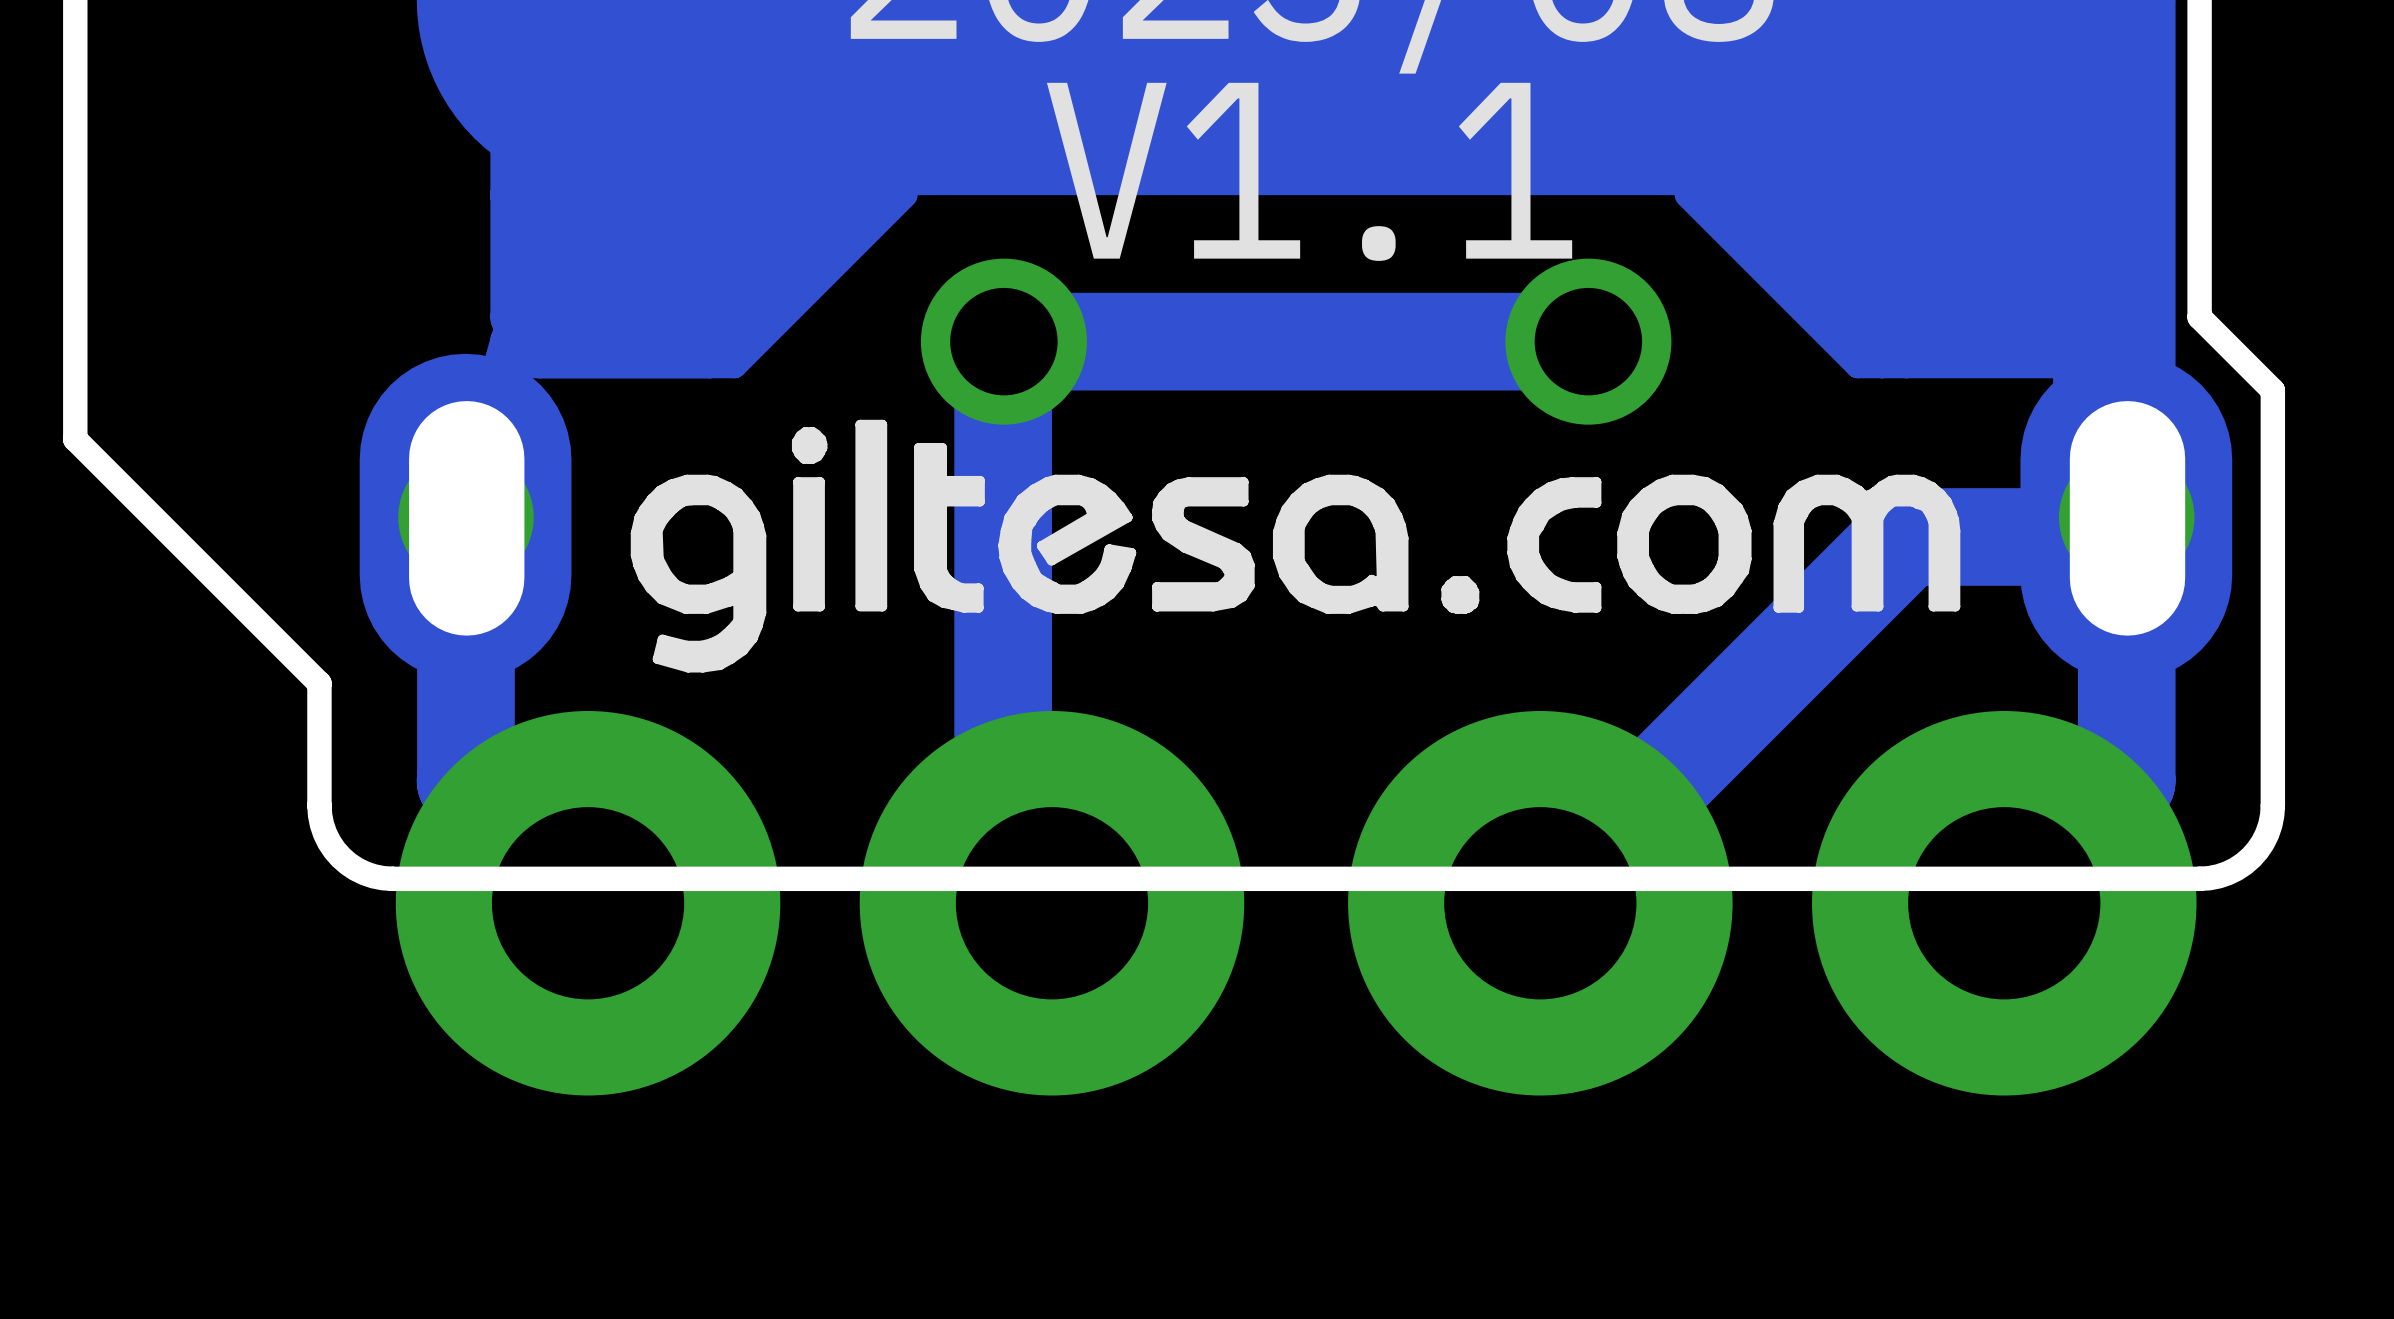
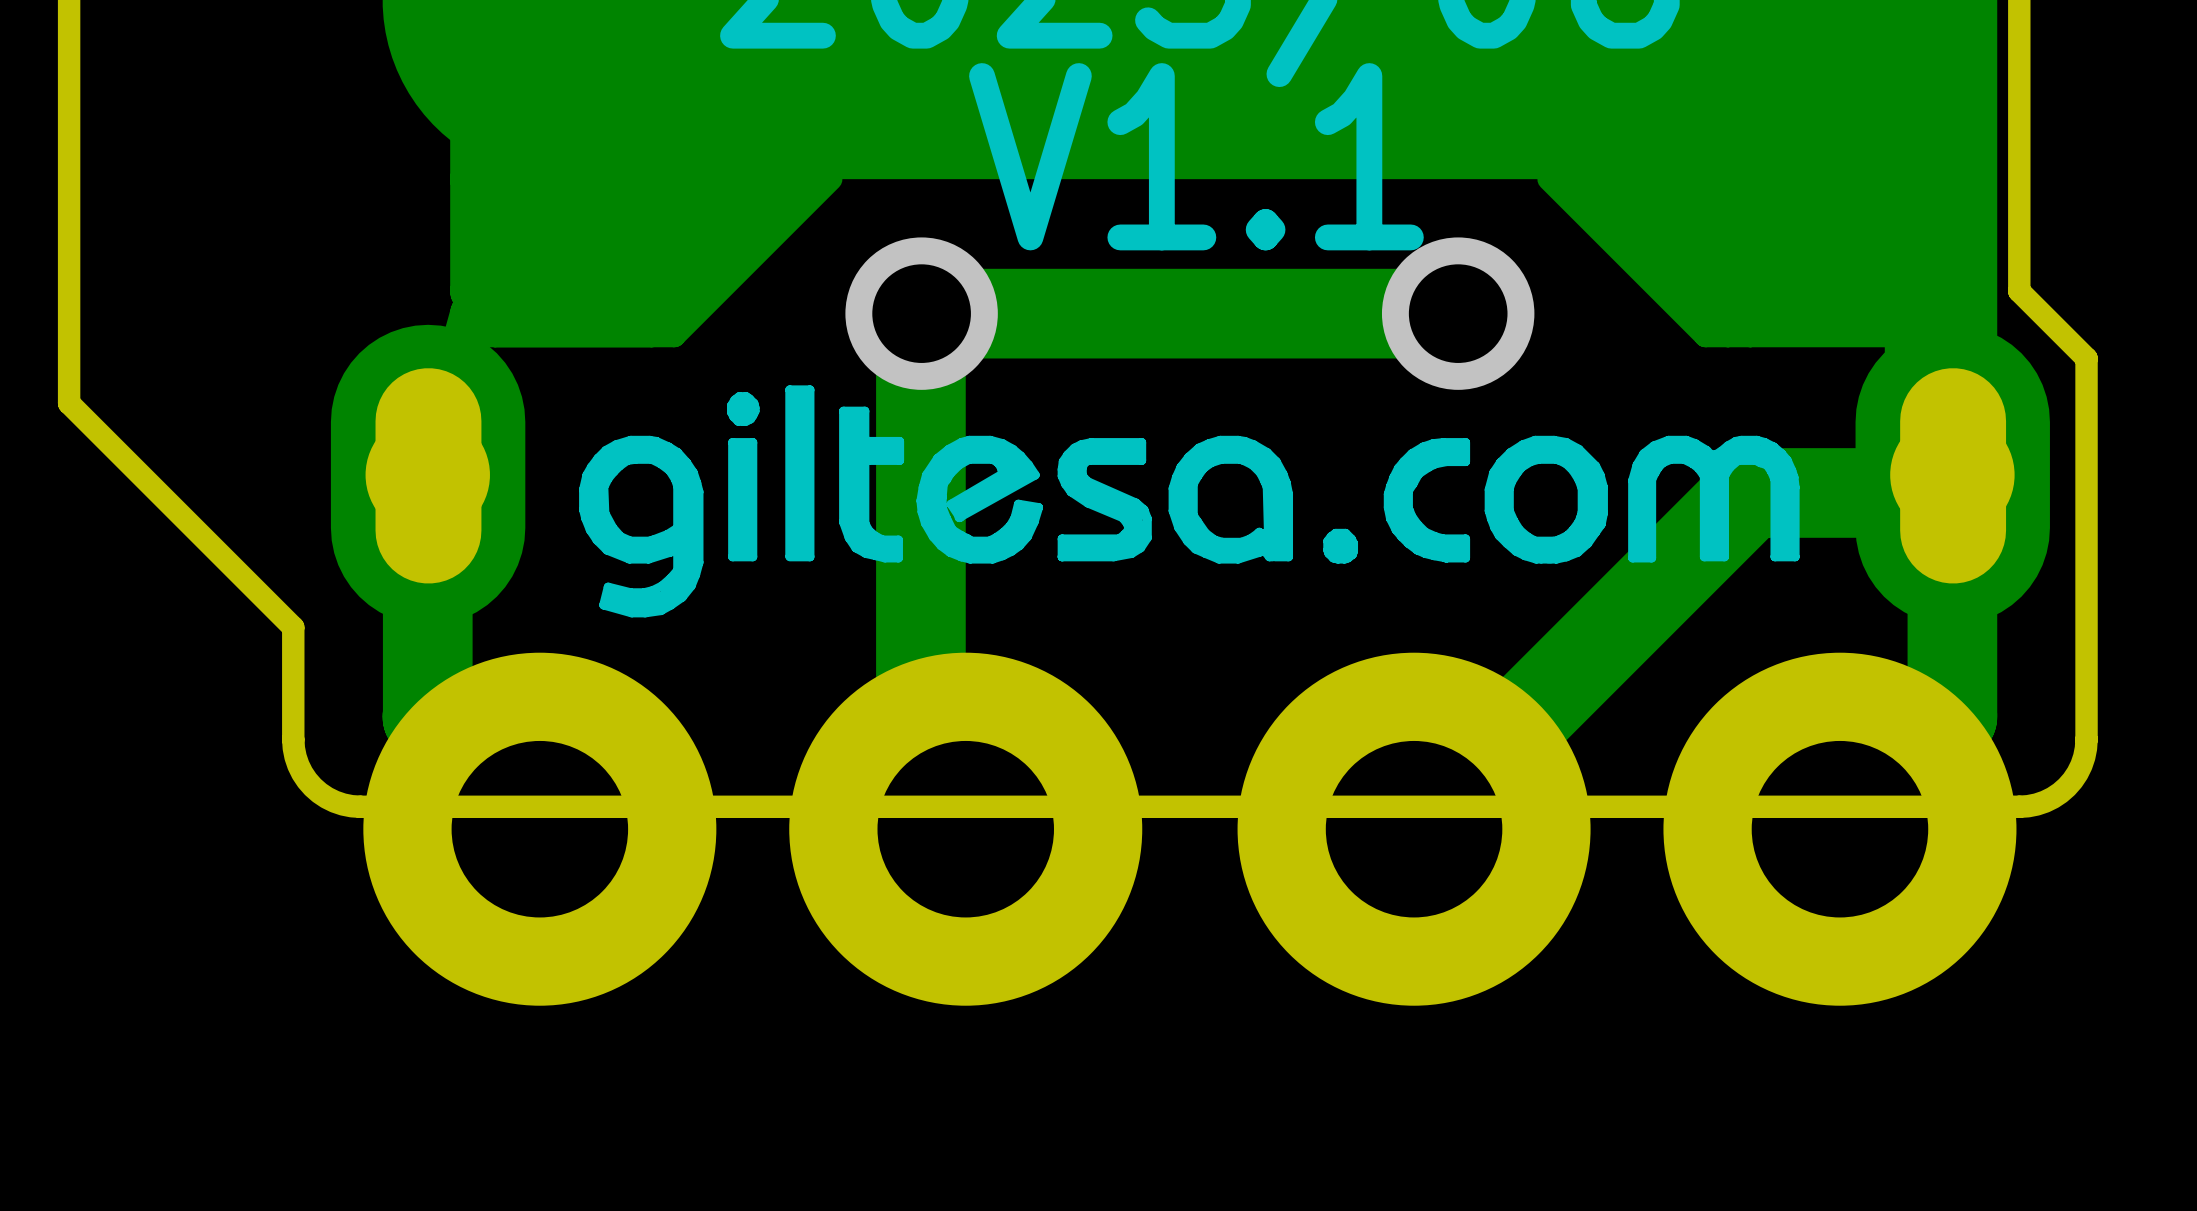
drawing shape: [630, 419, 1961, 673] -> [579, 385, 1800, 618]

